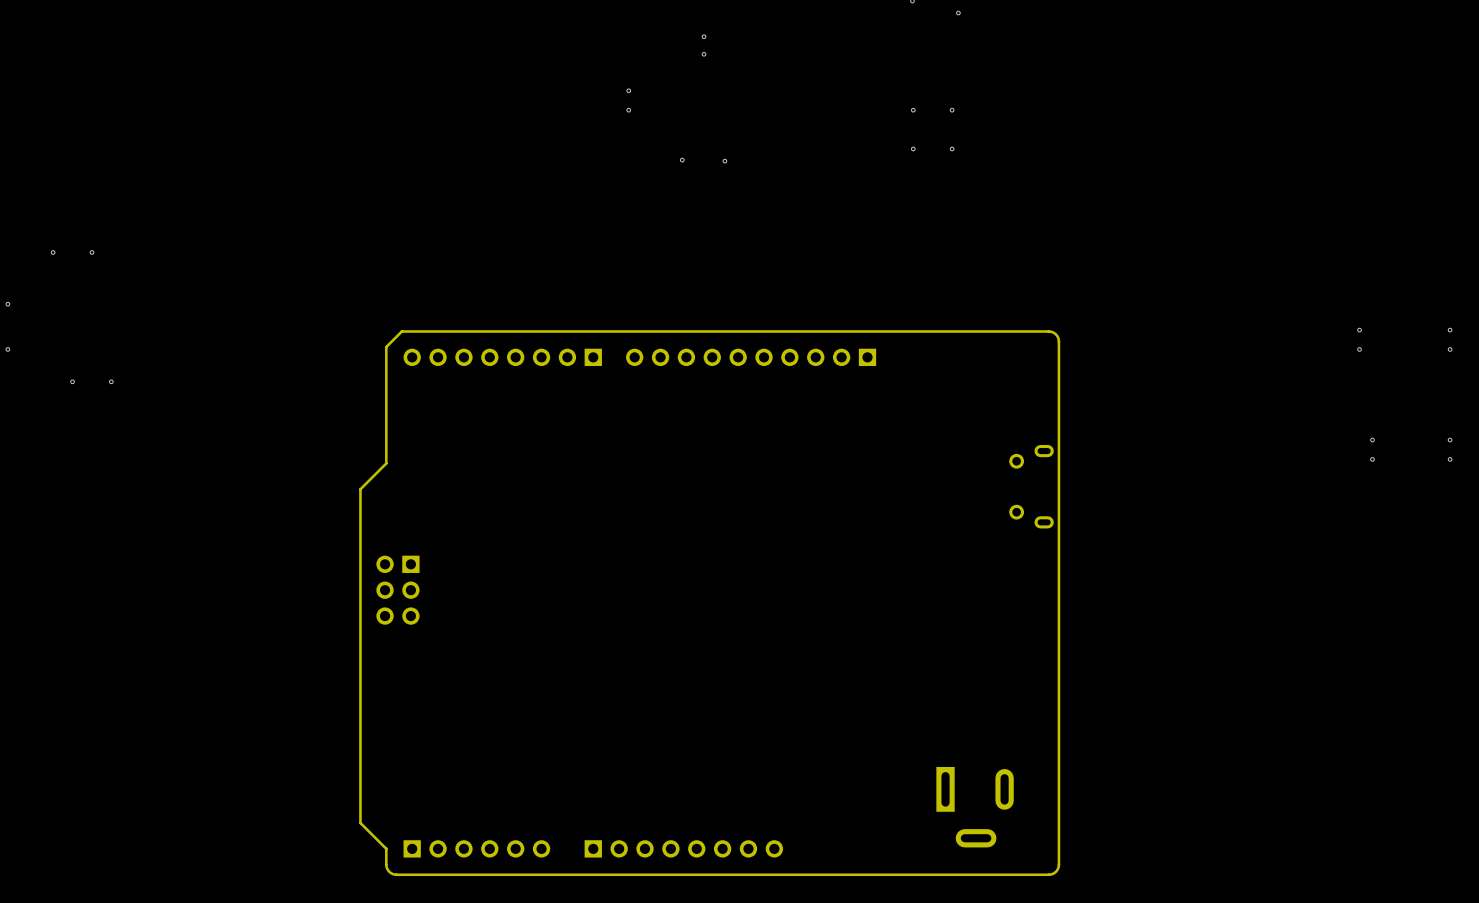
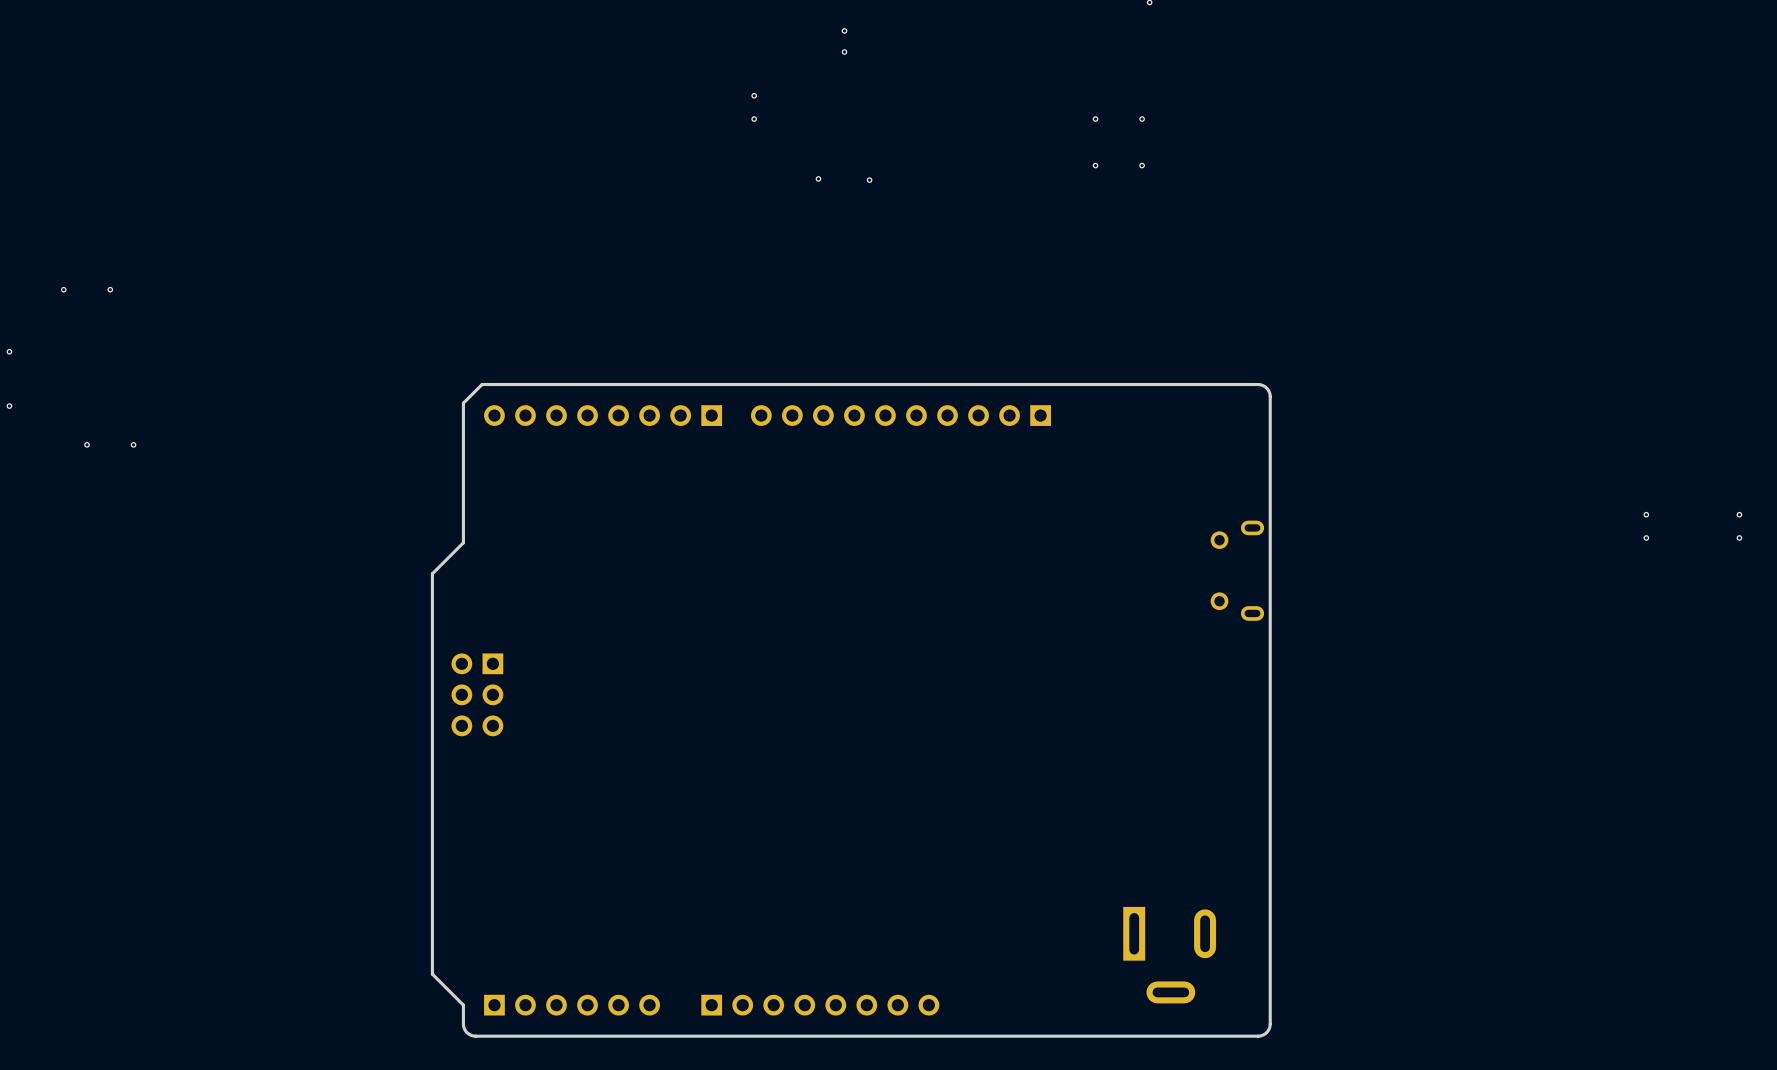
via: (1359, 330) -> none
via: (1450, 330) -> none
via: (1359, 349) -> none
via: (1450, 349) -> none

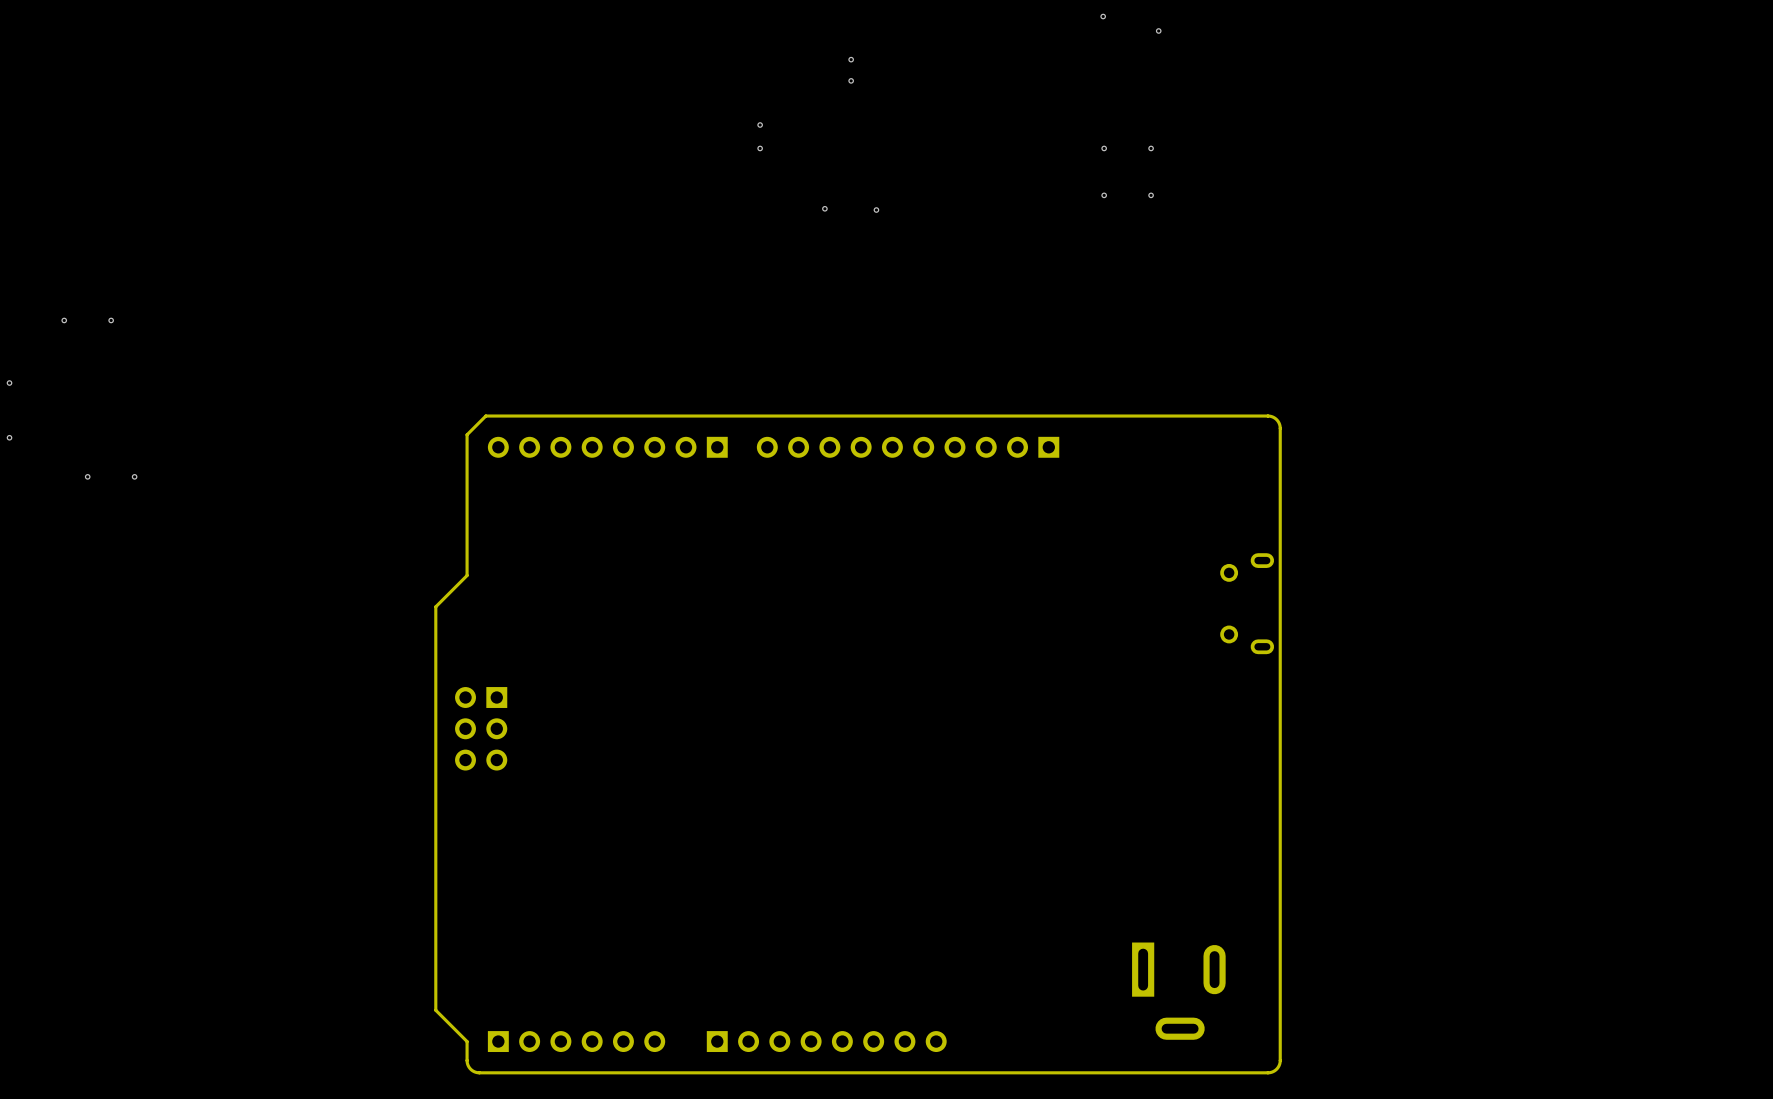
via: (1646, 514) -> none
via: (1739, 514) -> none
via: (1646, 537) -> none
via: (1739, 537) -> none

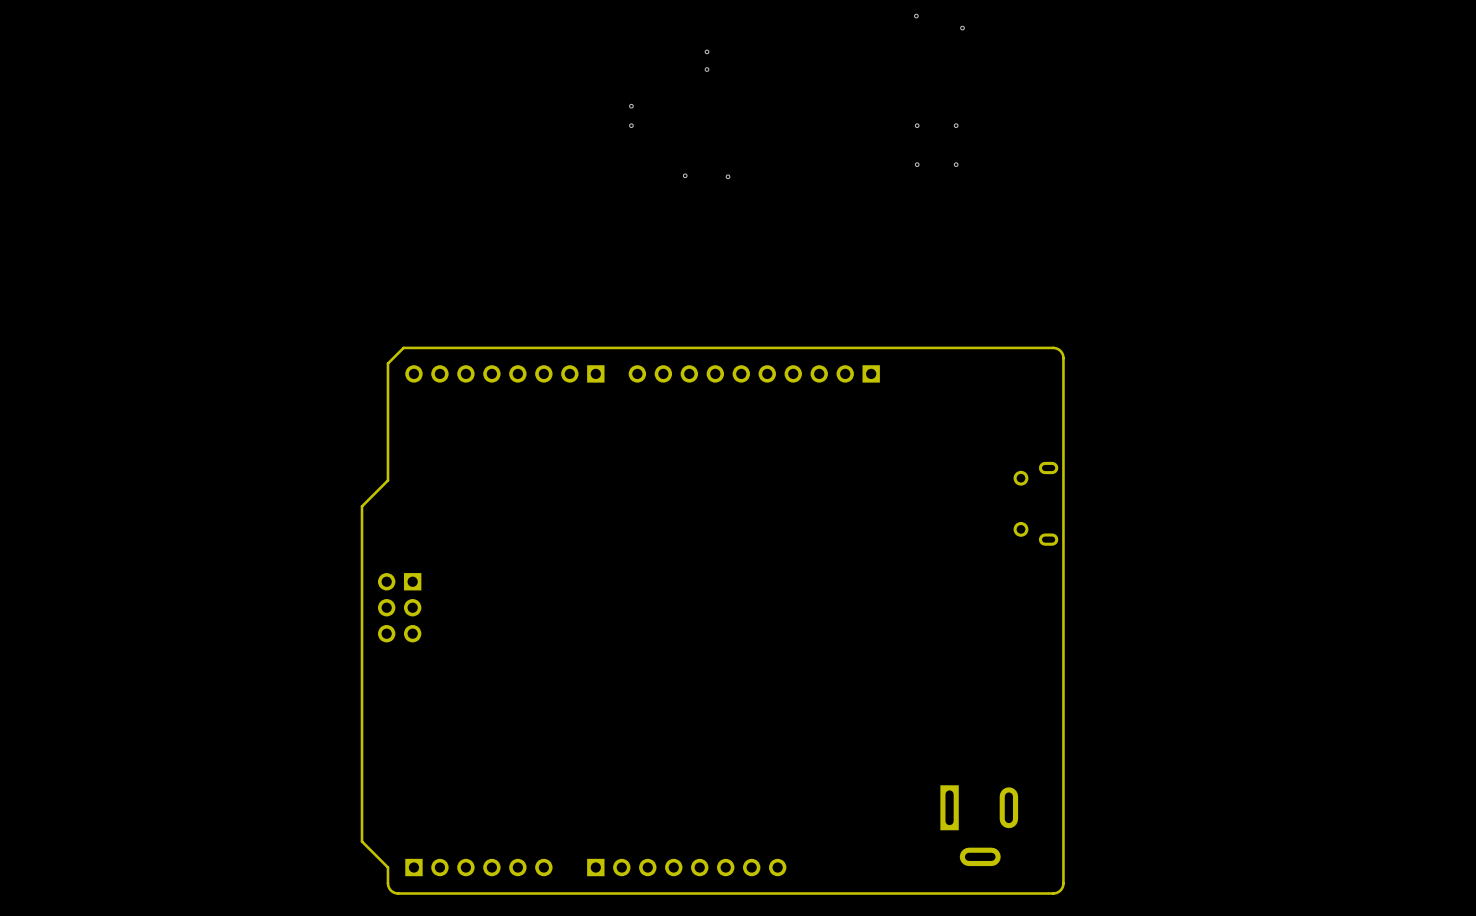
via: (64, 320) -> none
via: (111, 320) -> none
via: (9, 383) -> none
via: (9, 437) -> none
via: (87, 476) -> none
via: (134, 476) -> none

